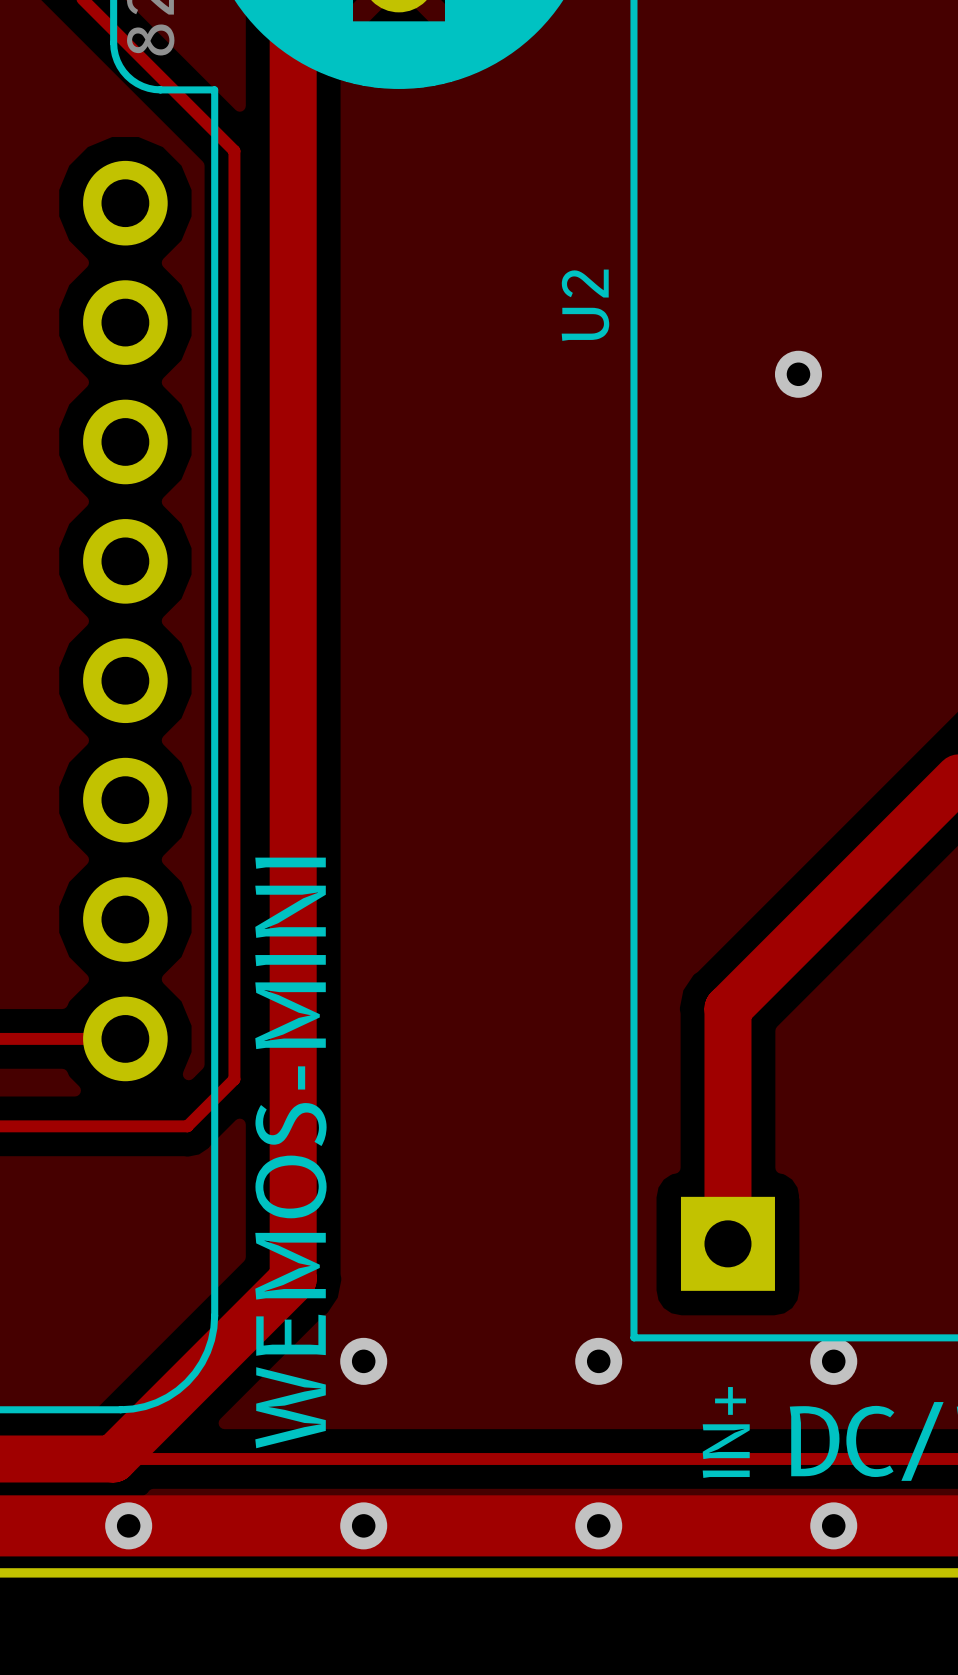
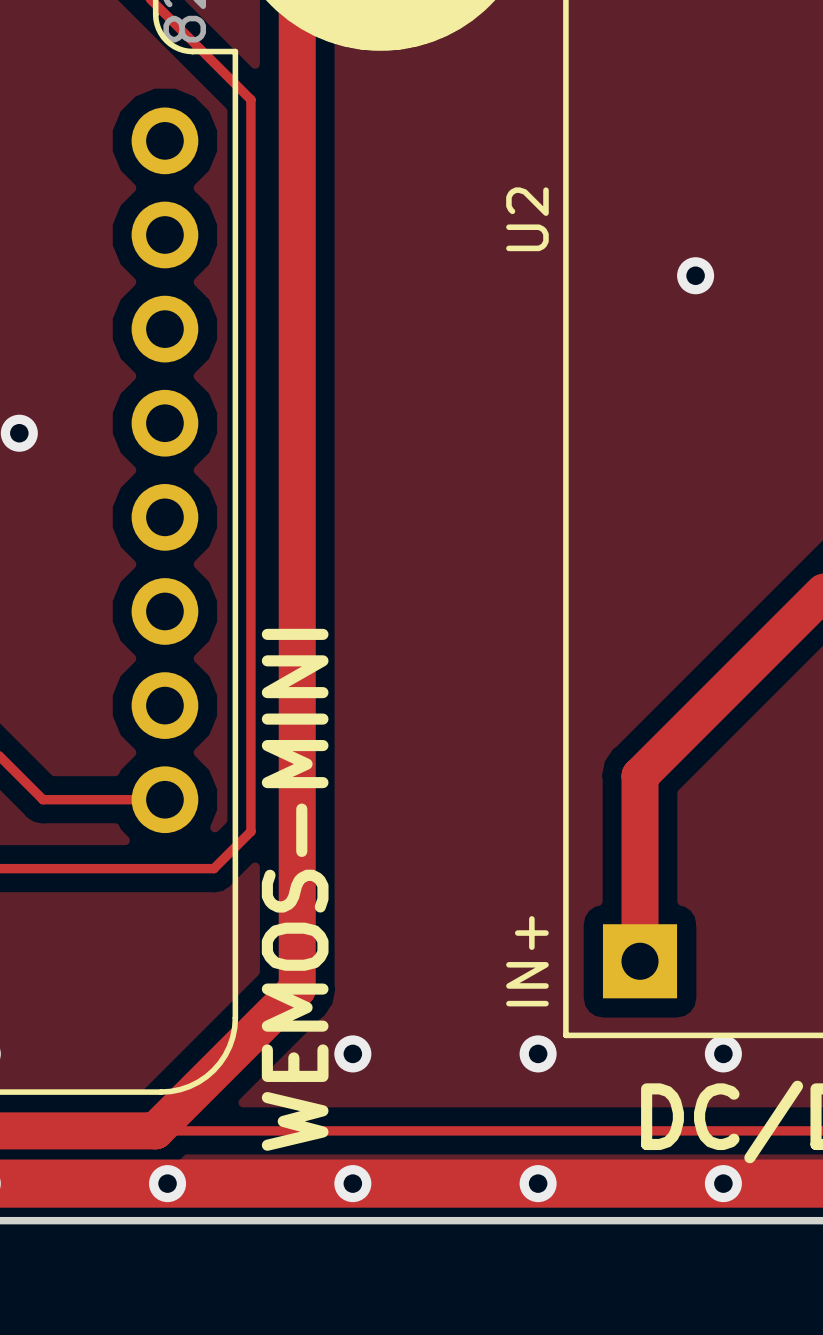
U2 text position: IN+ (726, 1432) -> IN+ (527, 961)

